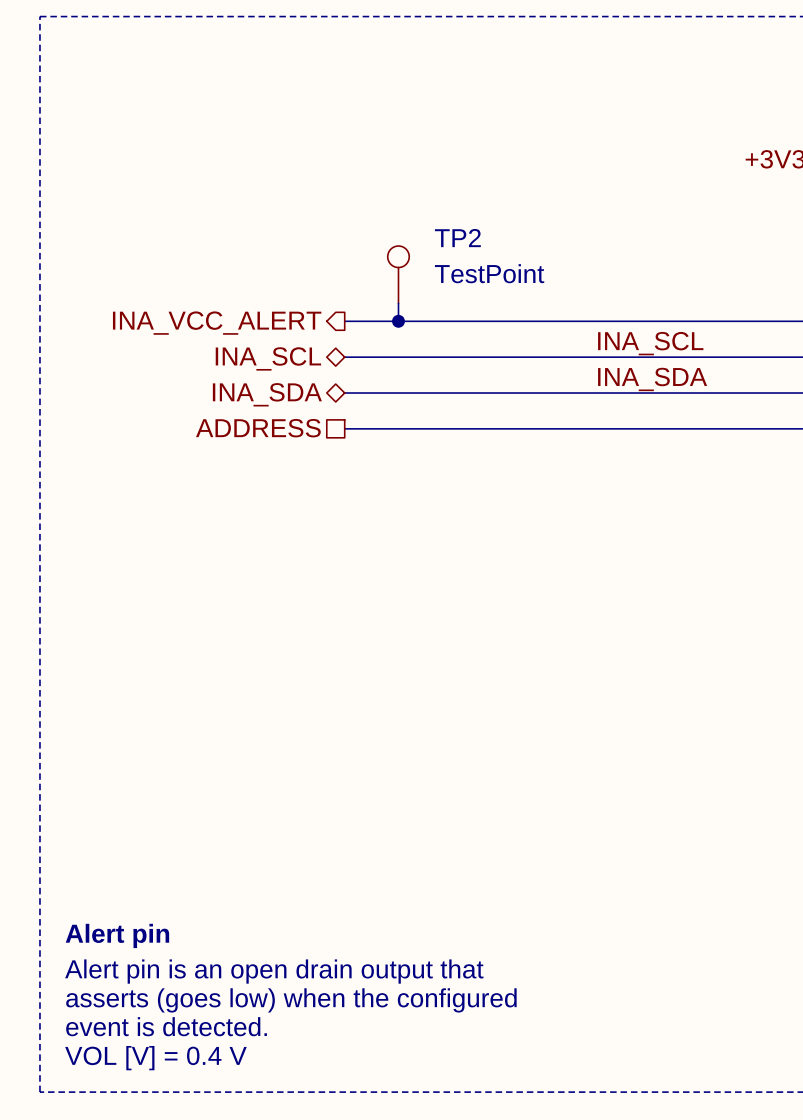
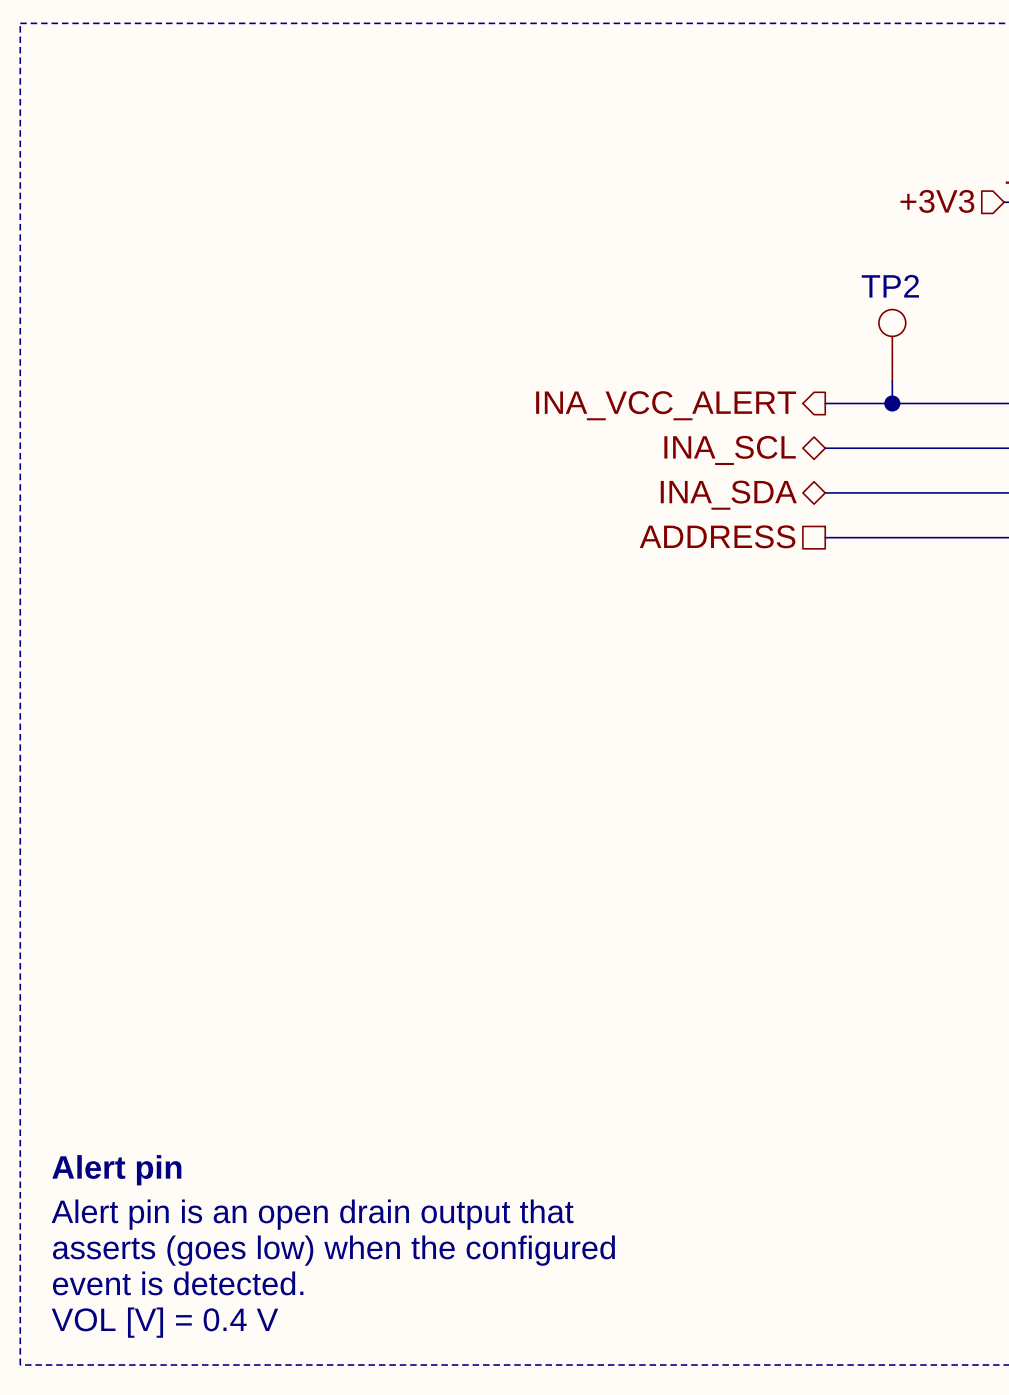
TP2 name position: TP2 (457, 238) -> TP2 (890, 286)
TP2 value: TestPoint (489, 273) -> none
TP2 position: (398, 274) -> (892, 345)
wire: (398, 303) (398, 321) -> (892, 381) (892, 403)
wire: (344, 321) (685, 321) -> none
junction: (398, 321) -> none
junction: none -> (892, 403)
hierarchical label position: INA_VCC_ALERT (217, 323) -> INA_VCC_ALERT (666, 405)
label: INA_SCL (650, 343) -> none
wire: (344, 357) (685, 357) -> none
hierarchical label position: INA_SCL (268, 358) -> INA_SCL (730, 450)
label: INA_SDA (652, 379) -> none
wire: (344, 393) (685, 393) -> none
hierarchical label position: INA_SDA (267, 394) -> INA_SDA (728, 495)
hierarchical label position: ADDRESS (258, 428) -> ADDRESS (717, 536)
wire: (344, 428) (685, 428) -> none

